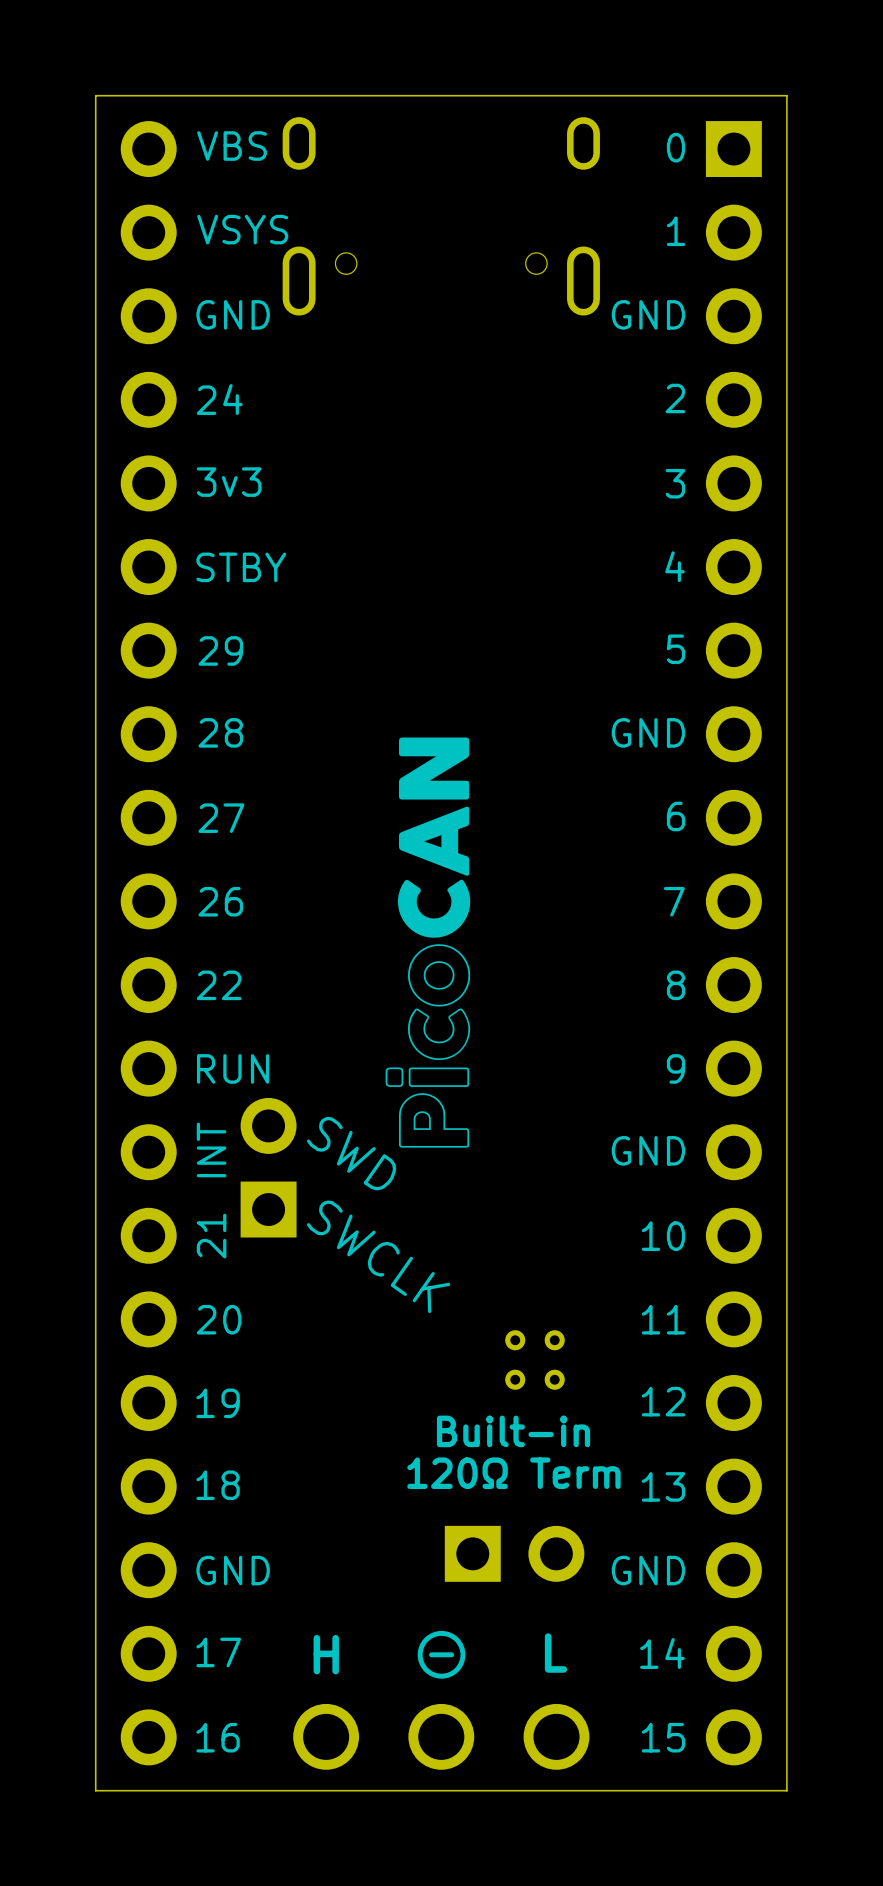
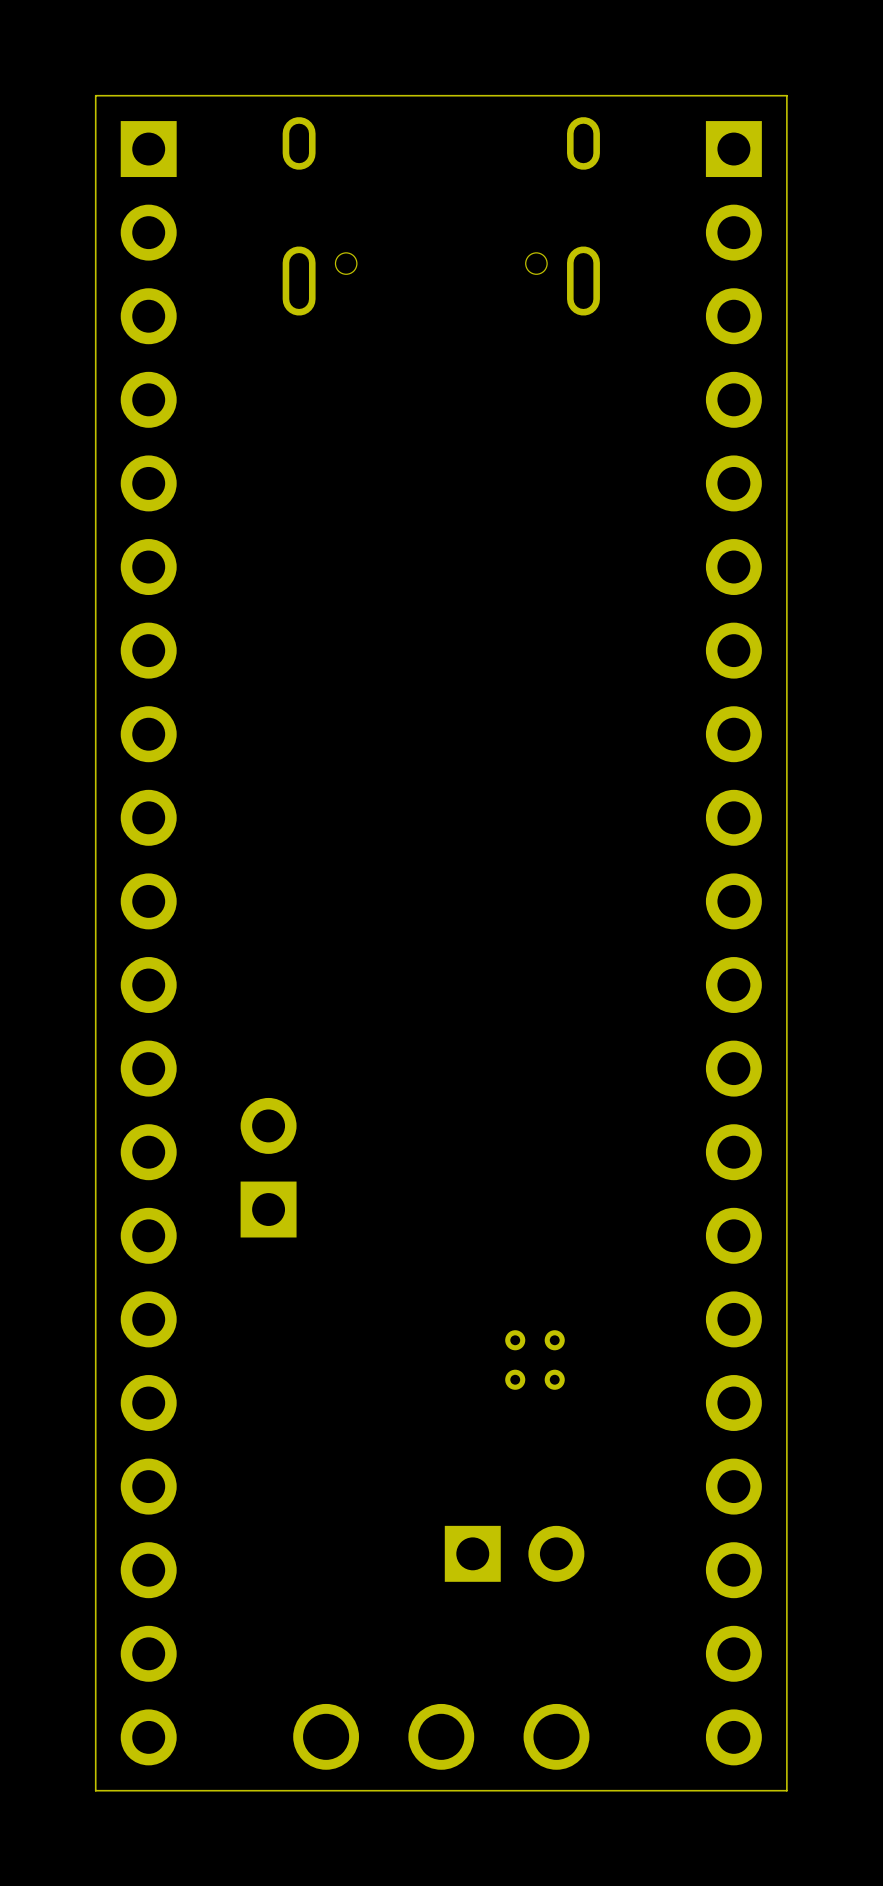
part footprint: [120, 121, 177, 1766] -> [120, 121, 177, 1766]
text: VBS (232, 146) -> none
text: 0 (676, 147) -> none
text: VSYS (242, 229) -> none
text: 1 (676, 231) -> none
text: GND (233, 314) -> none
text: GND (648, 314) -> none
text: 2 (675, 398) -> none
text: 24 (219, 399) -> none
text: 3v3 (229, 482) -> none
text: 3 (675, 483) -> none
text: 4 (674, 566) -> none
text: STBY (241, 567) -> none
text: 5 (676, 649) -> none
text: 29 (220, 650) -> none
text: 28 (220, 732) -> none
text: GND (648, 732) -> none
drawing: [385, 737, 471, 1148] -> none
text: 6 (676, 816) -> none
text: 27 (221, 818) -> none
text: 26 (220, 901) -> none
text: 7 (674, 901) -> none
text: 22 (219, 985) -> none
text: 8 (676, 985) -> none
text: RUN (233, 1068) -> none
text: 9 (676, 1068) -> none
text: INT (211, 1149) -> none
text: GND (648, 1150) -> none
text: SWD (351, 1153) -> none
text: 21 (211, 1236) -> none
text: 10 (663, 1236) -> none
text: SWCLK (378, 1256) -> none
text: 20 (219, 1319) -> none
text: 11 (663, 1319) -> none
text: 12 (663, 1401) -> none
text: 19 (218, 1403) -> none
text: Built-in (513, 1431) -> none
text: 120Ω Term (513, 1473) -> none
text: 18 (218, 1485) -> none
text: 13 (663, 1486) -> none
text: GND (233, 1570) -> none
text: GND (648, 1570) -> none
drawing: [417, 1630, 466, 1679] -> none
text: 17 (218, 1652) -> none
text: L (555, 1653) -> none
text: 14 (662, 1653) -> none
text: H (326, 1654) -> none
line: (451, 1654) (431, 1654) -> none
text: 16 (218, 1737) -> none
text: 15 (663, 1737) -> none

